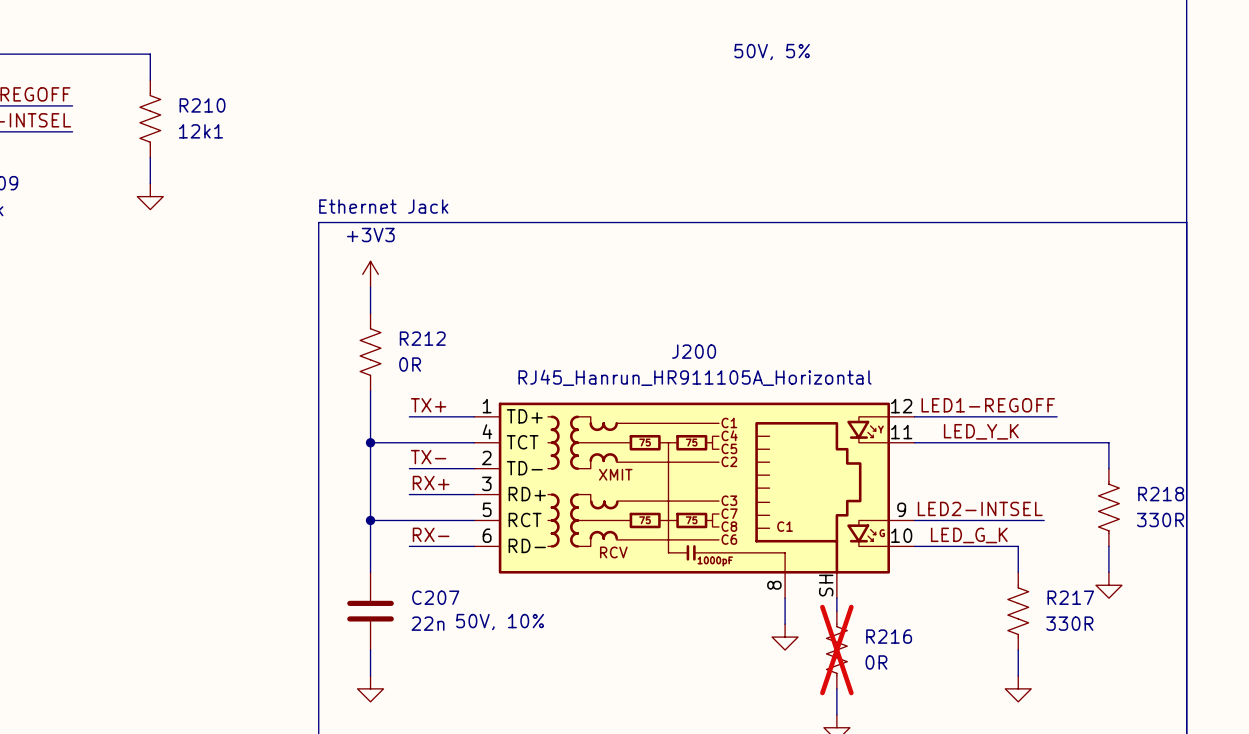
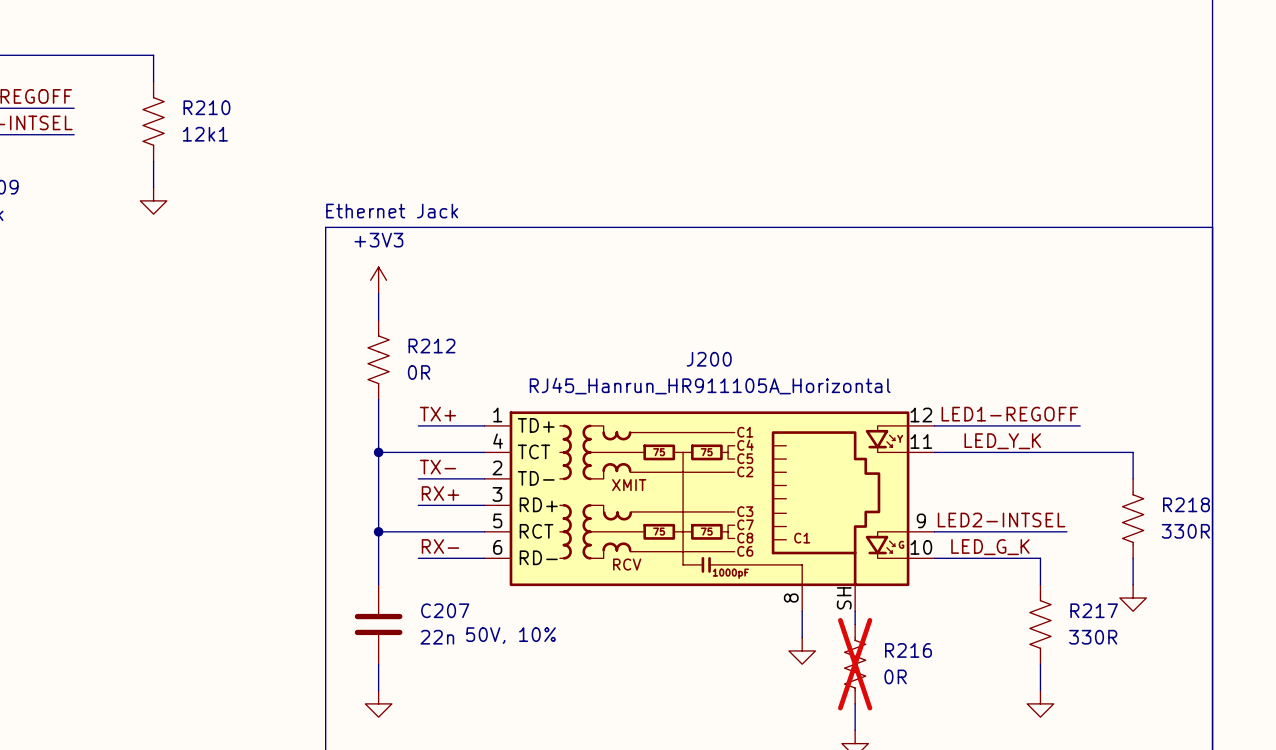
text: 50V, 5% (772, 52) -> none

